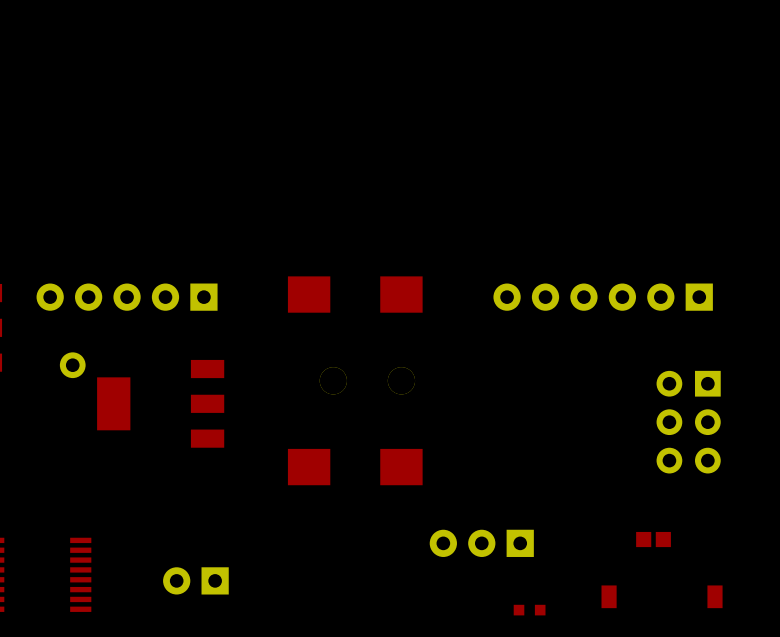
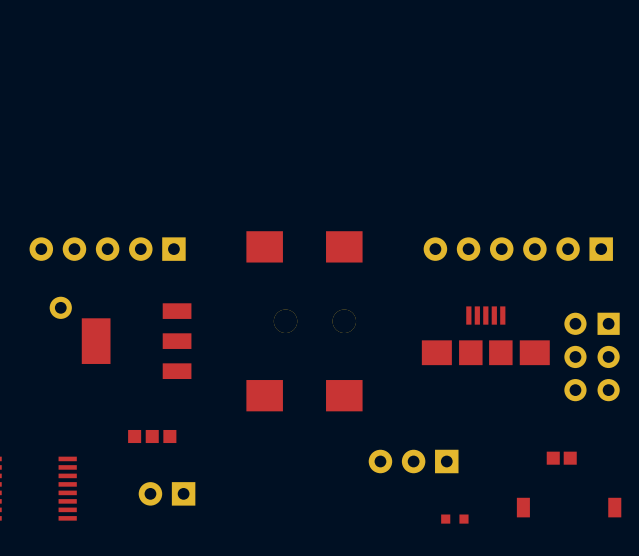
part: none -> (485, 335)
part: none -> (152, 436)

